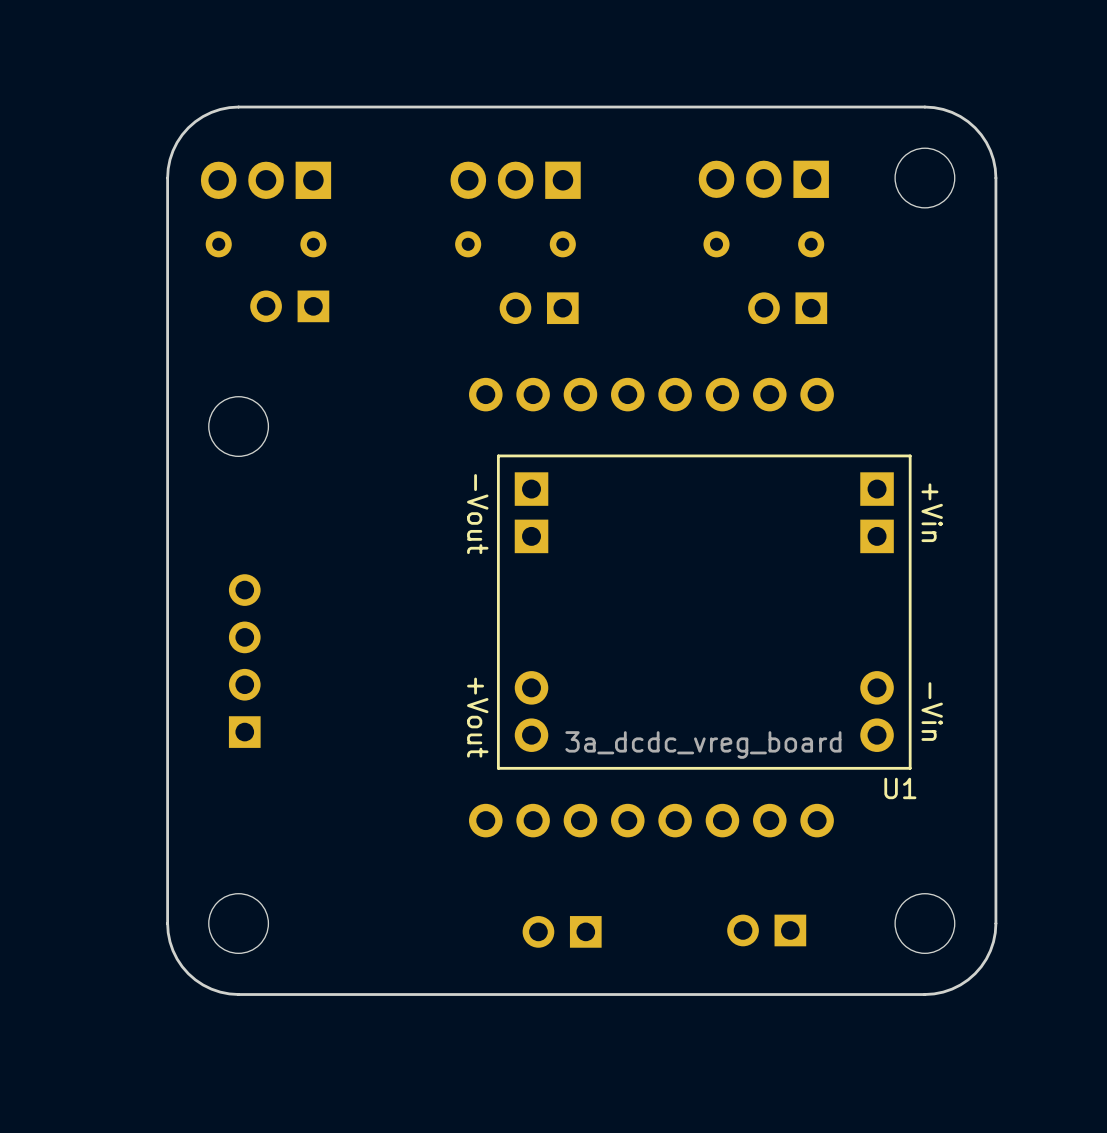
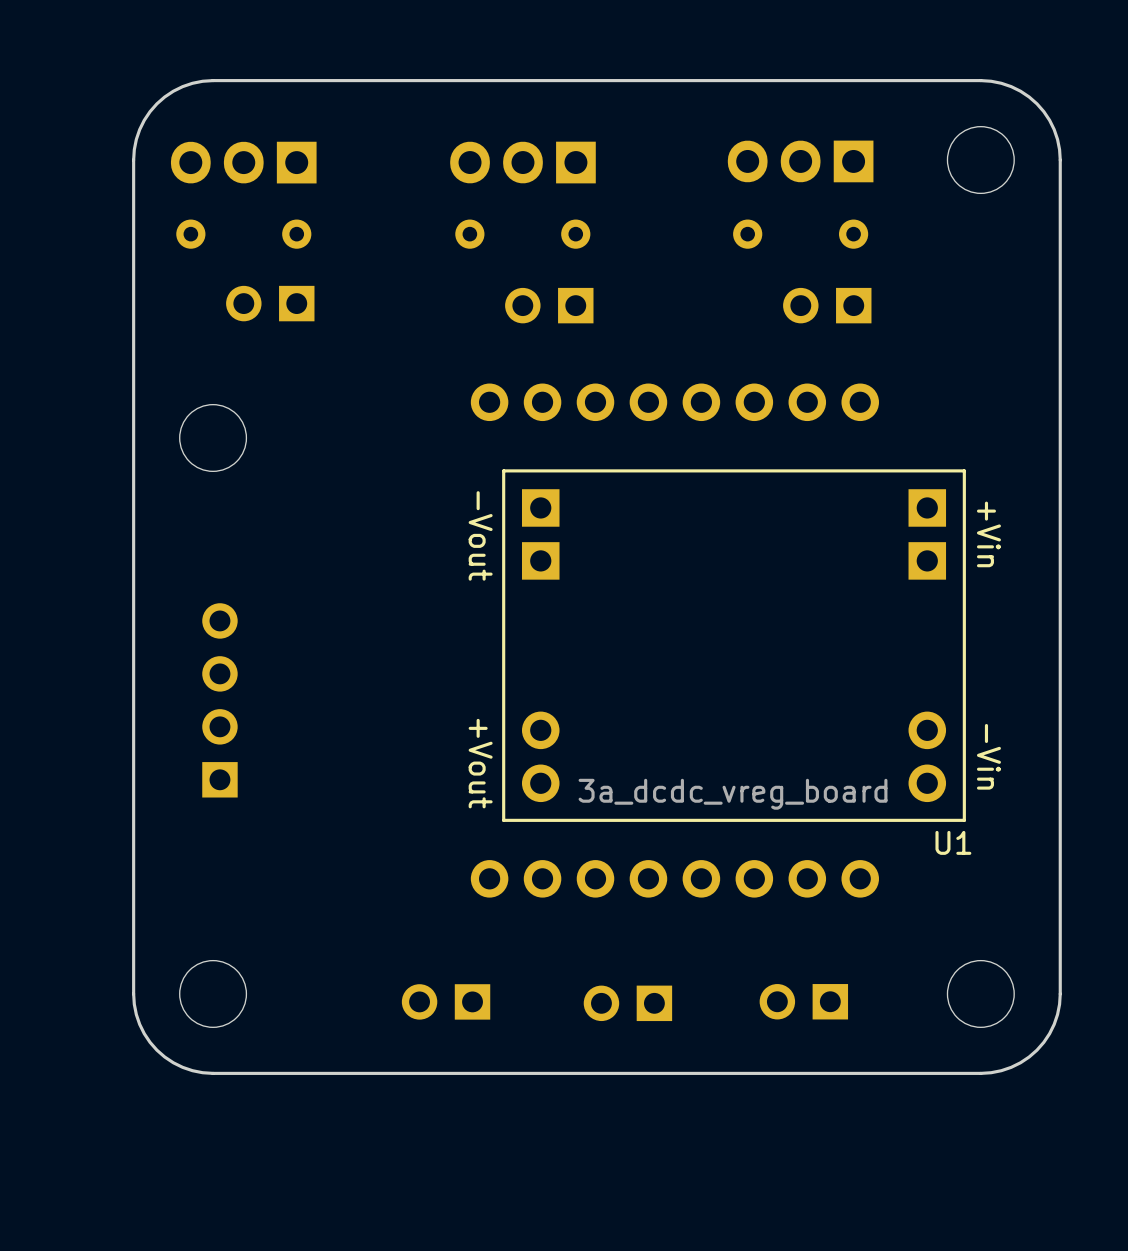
part: none -> (446, 1001)
part position: (562, 931) -> (627, 1003)

